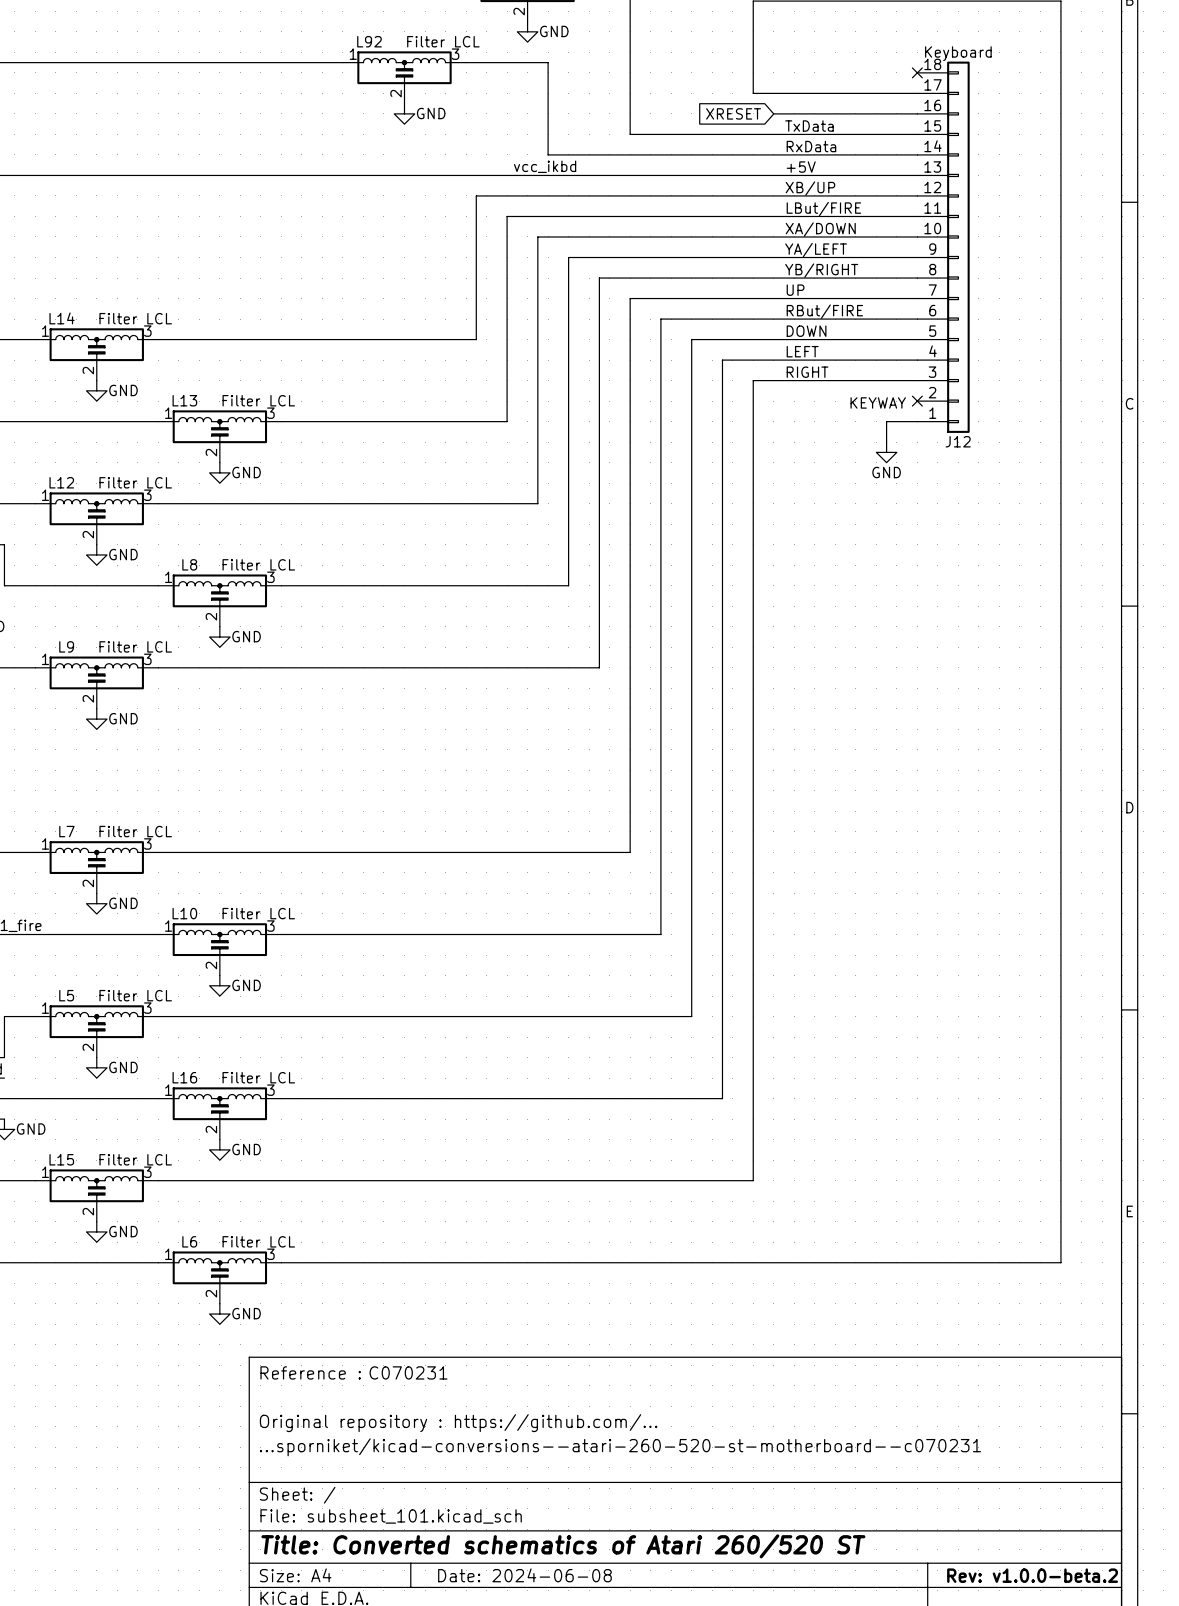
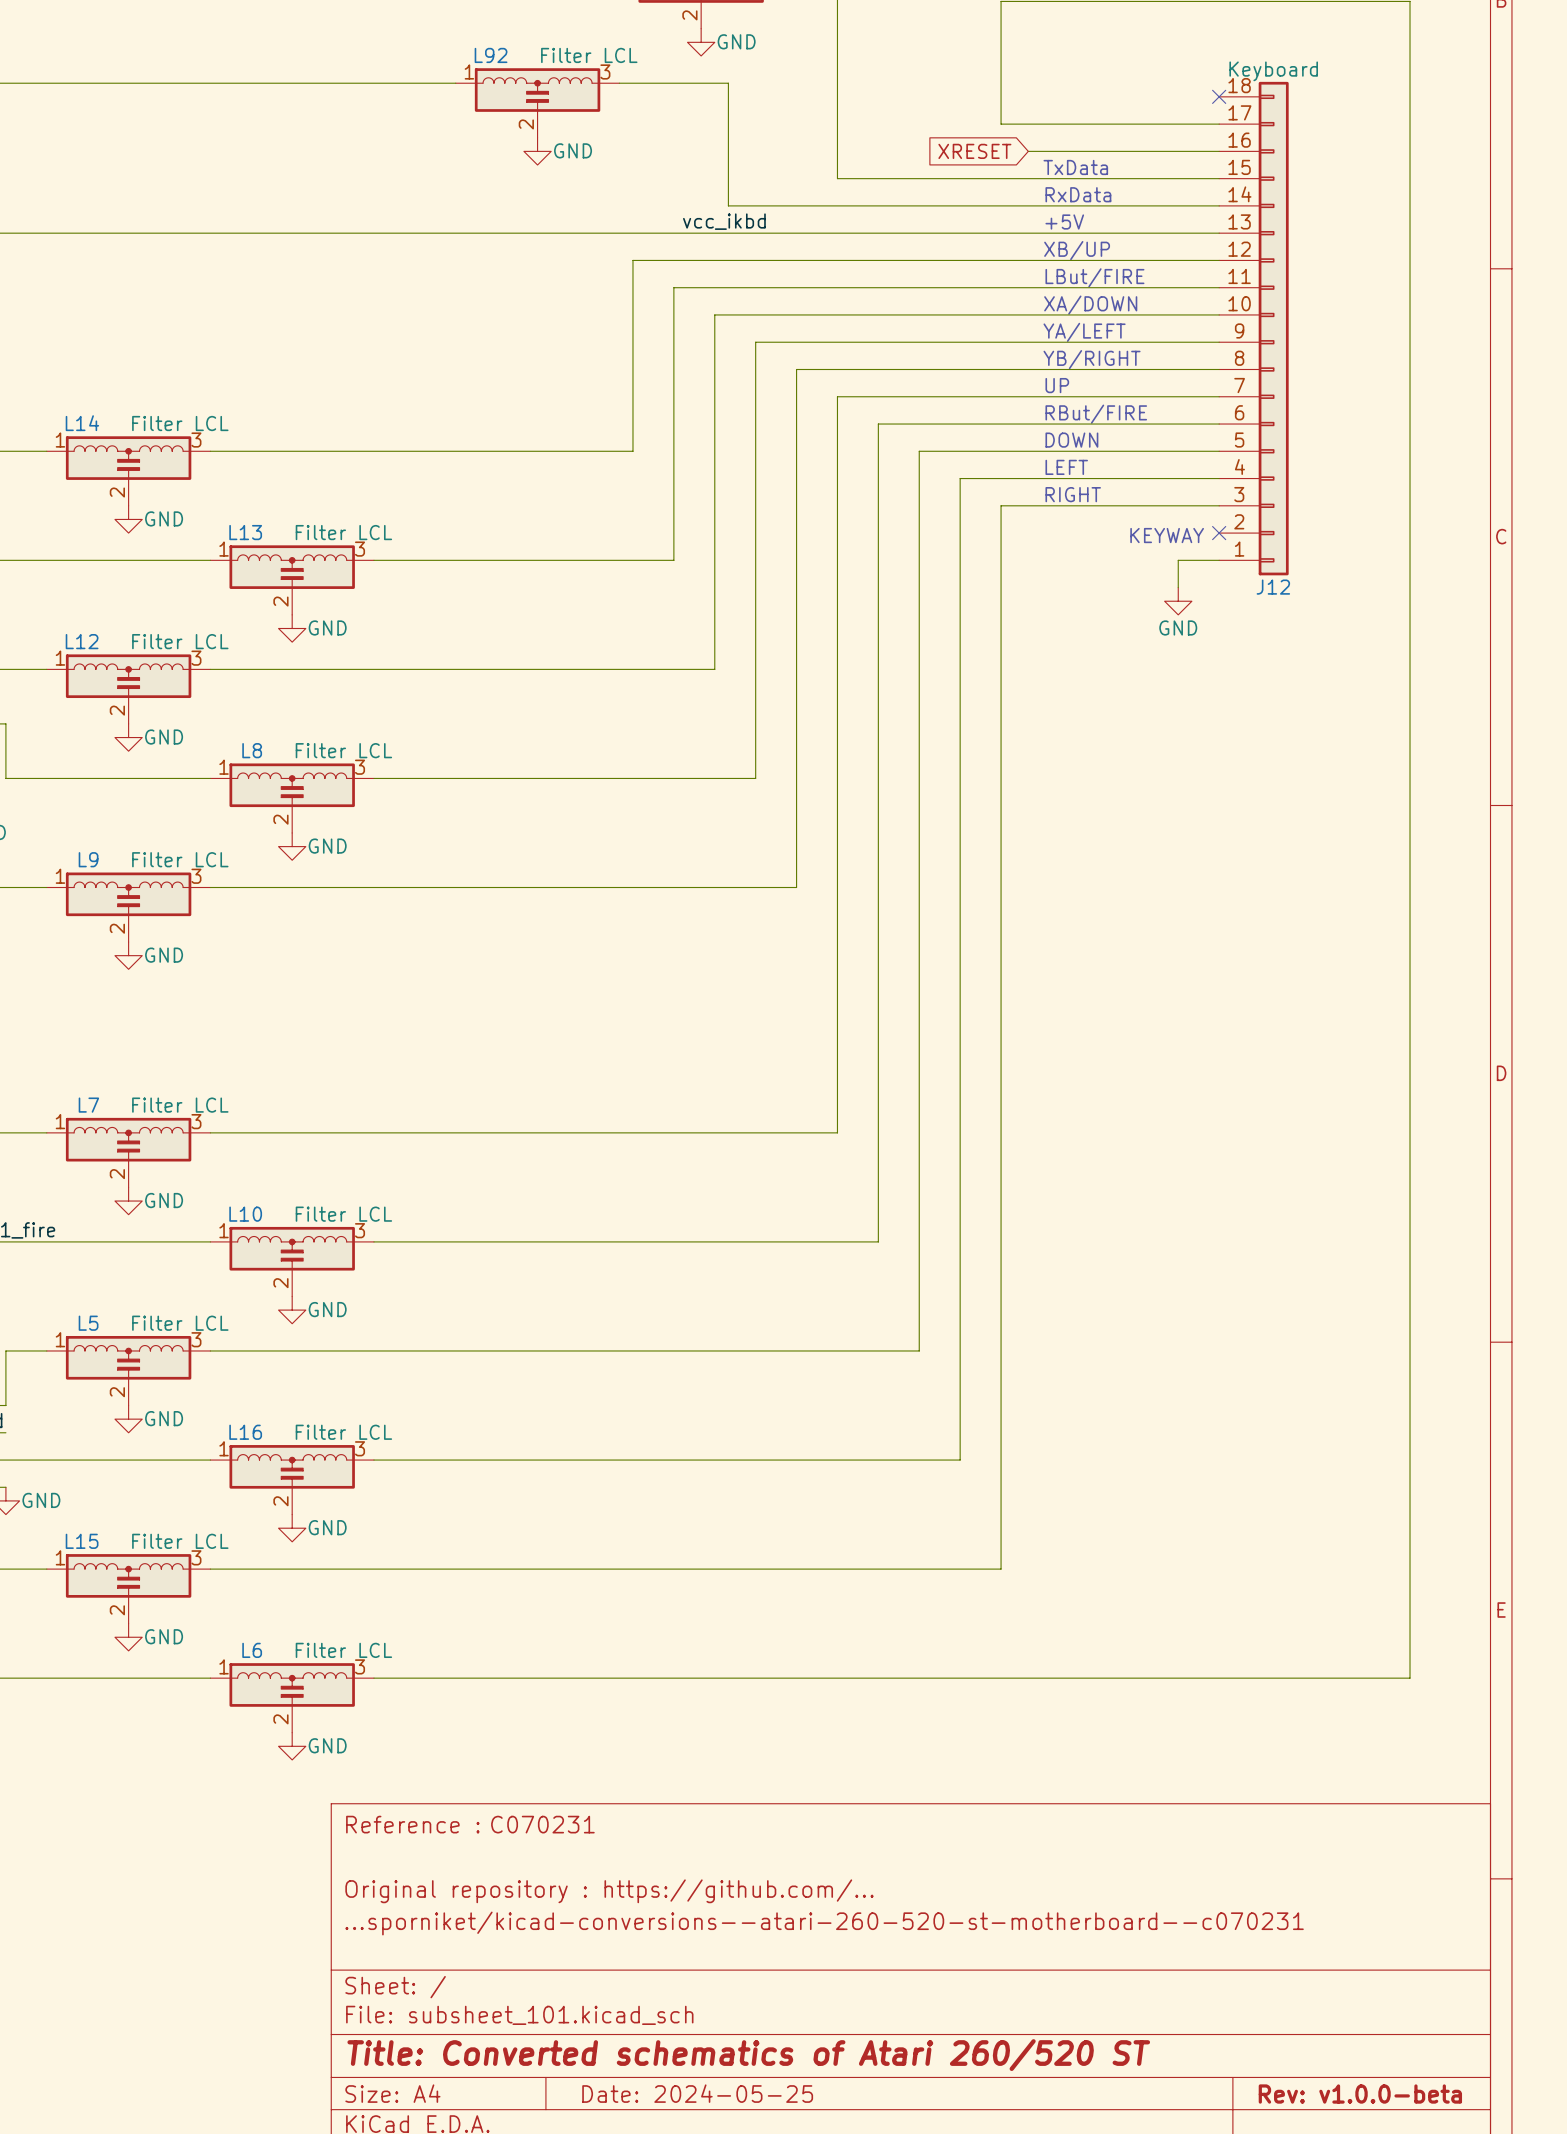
title block: Date: 2024-06-08 (524, 1575) -> Date: 2024-05-25 (697, 2093)
title block: Rev: v1.0.0-beta.2 (1032, 1575) -> Rev: v1.0.0-beta (1360, 2094)

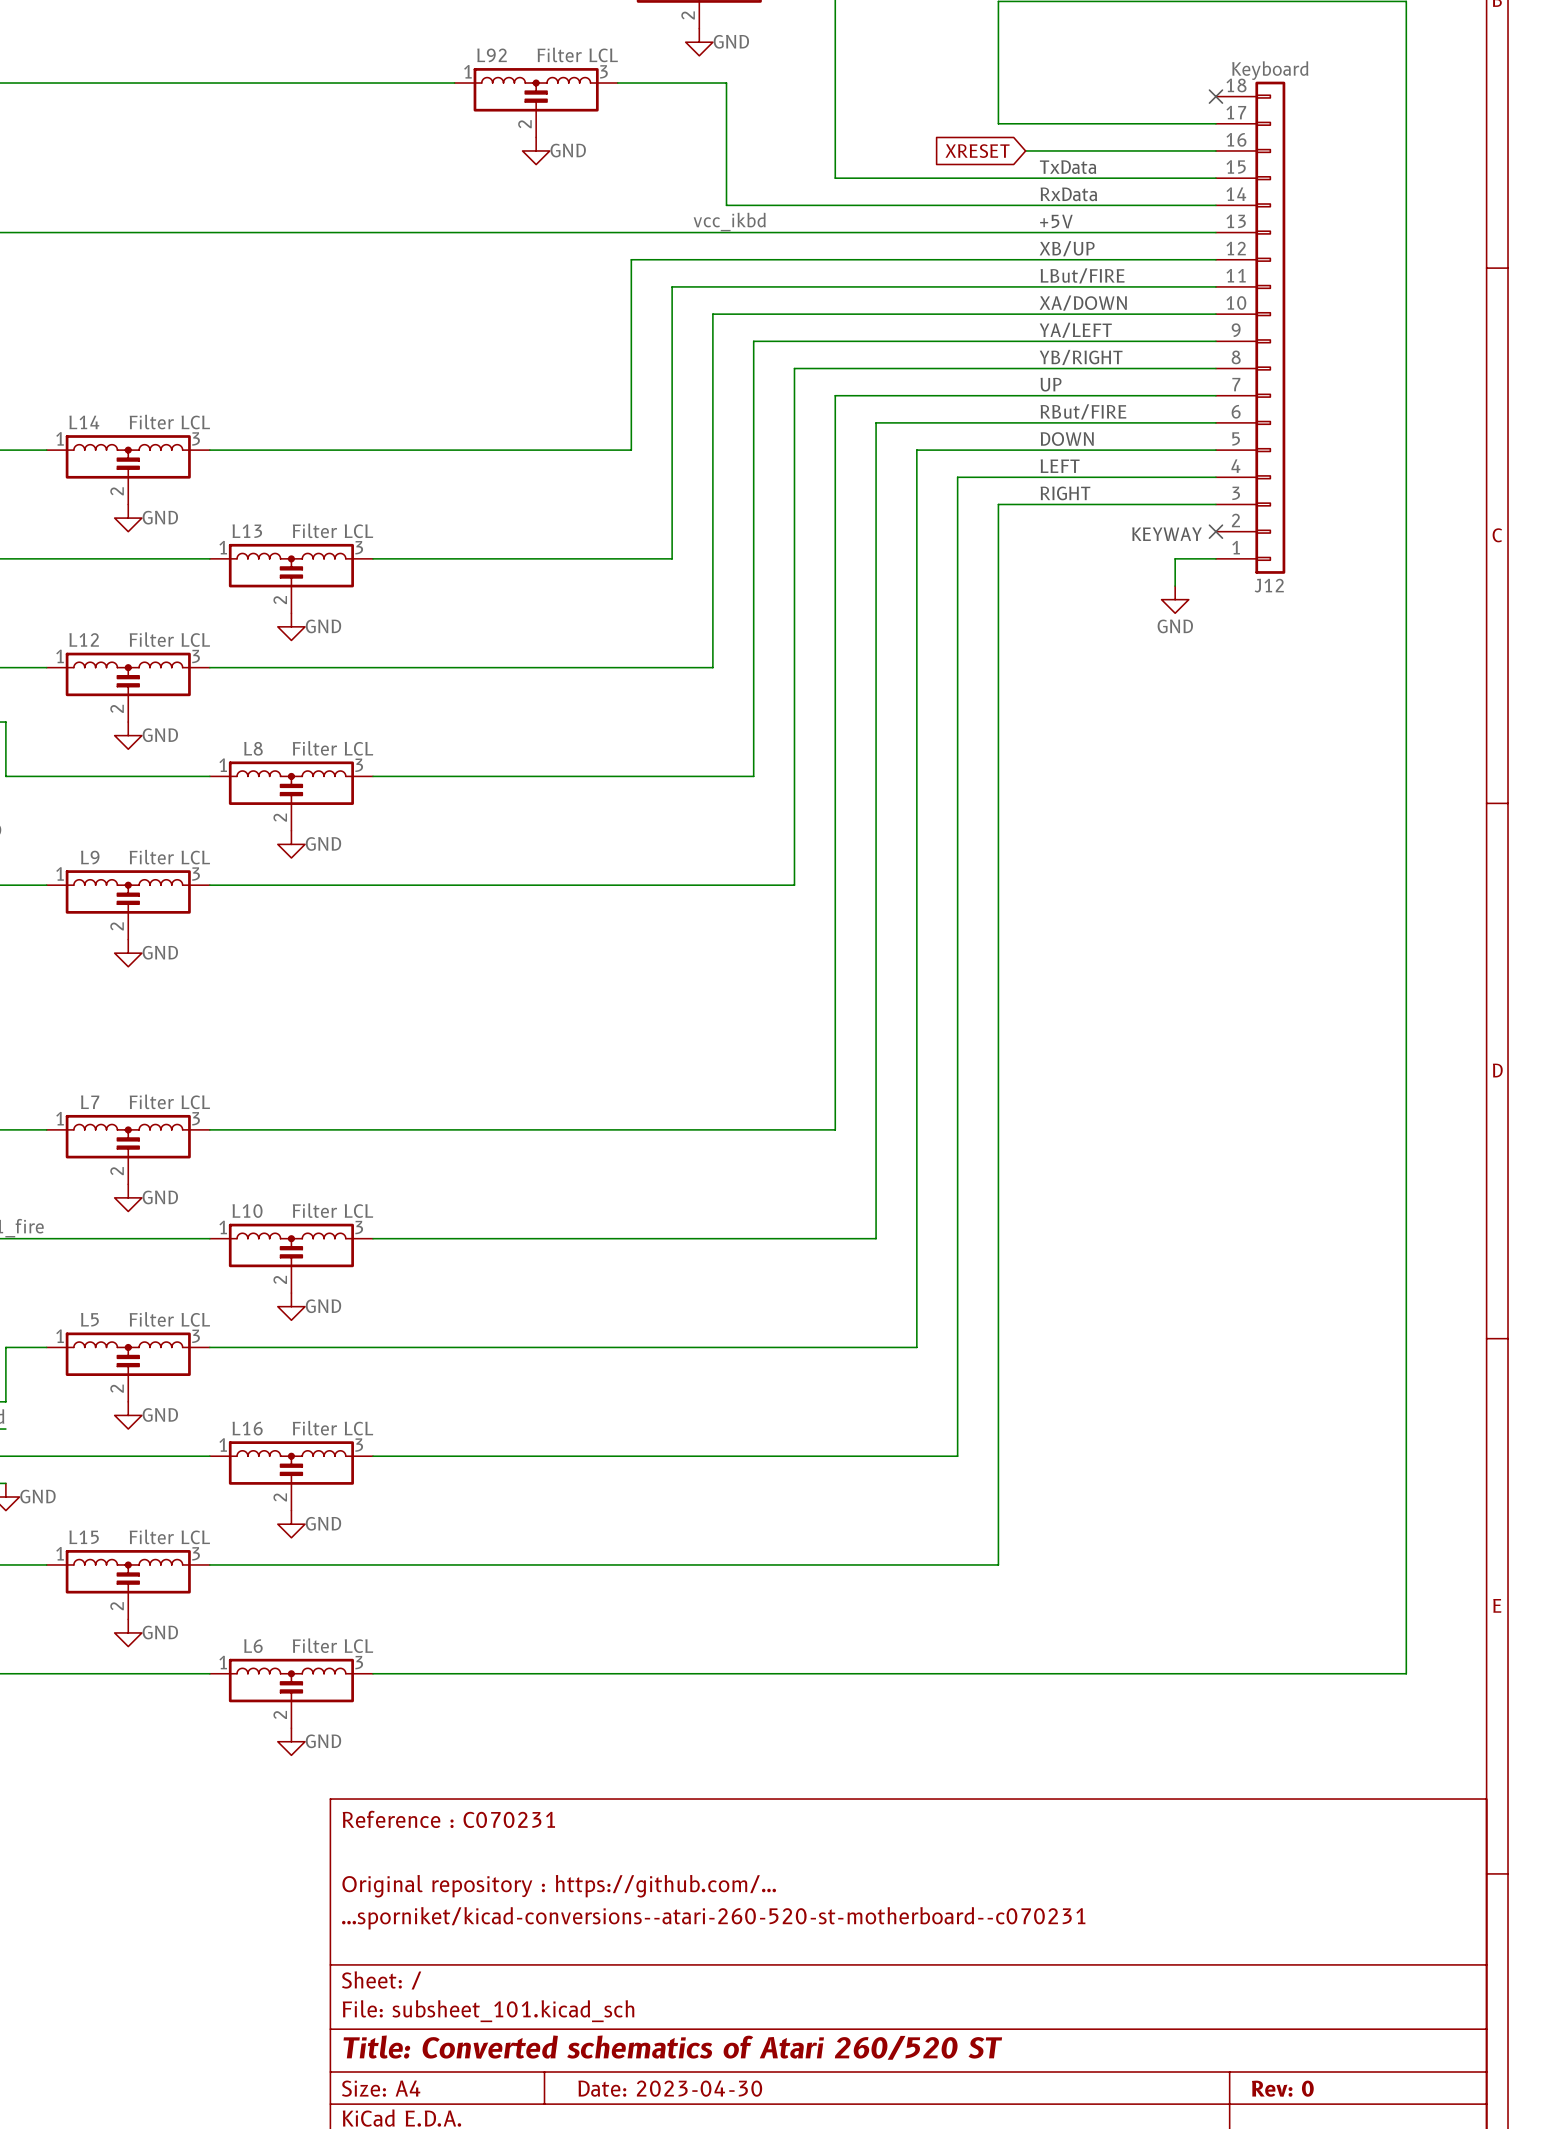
title block: Date: 2024-05-25 (697, 2093) -> Date: 2023-04-30 (670, 2088)
title block: Rev: v1.0.0-beta (1360, 2094) -> Rev: 0 (1282, 2088)

